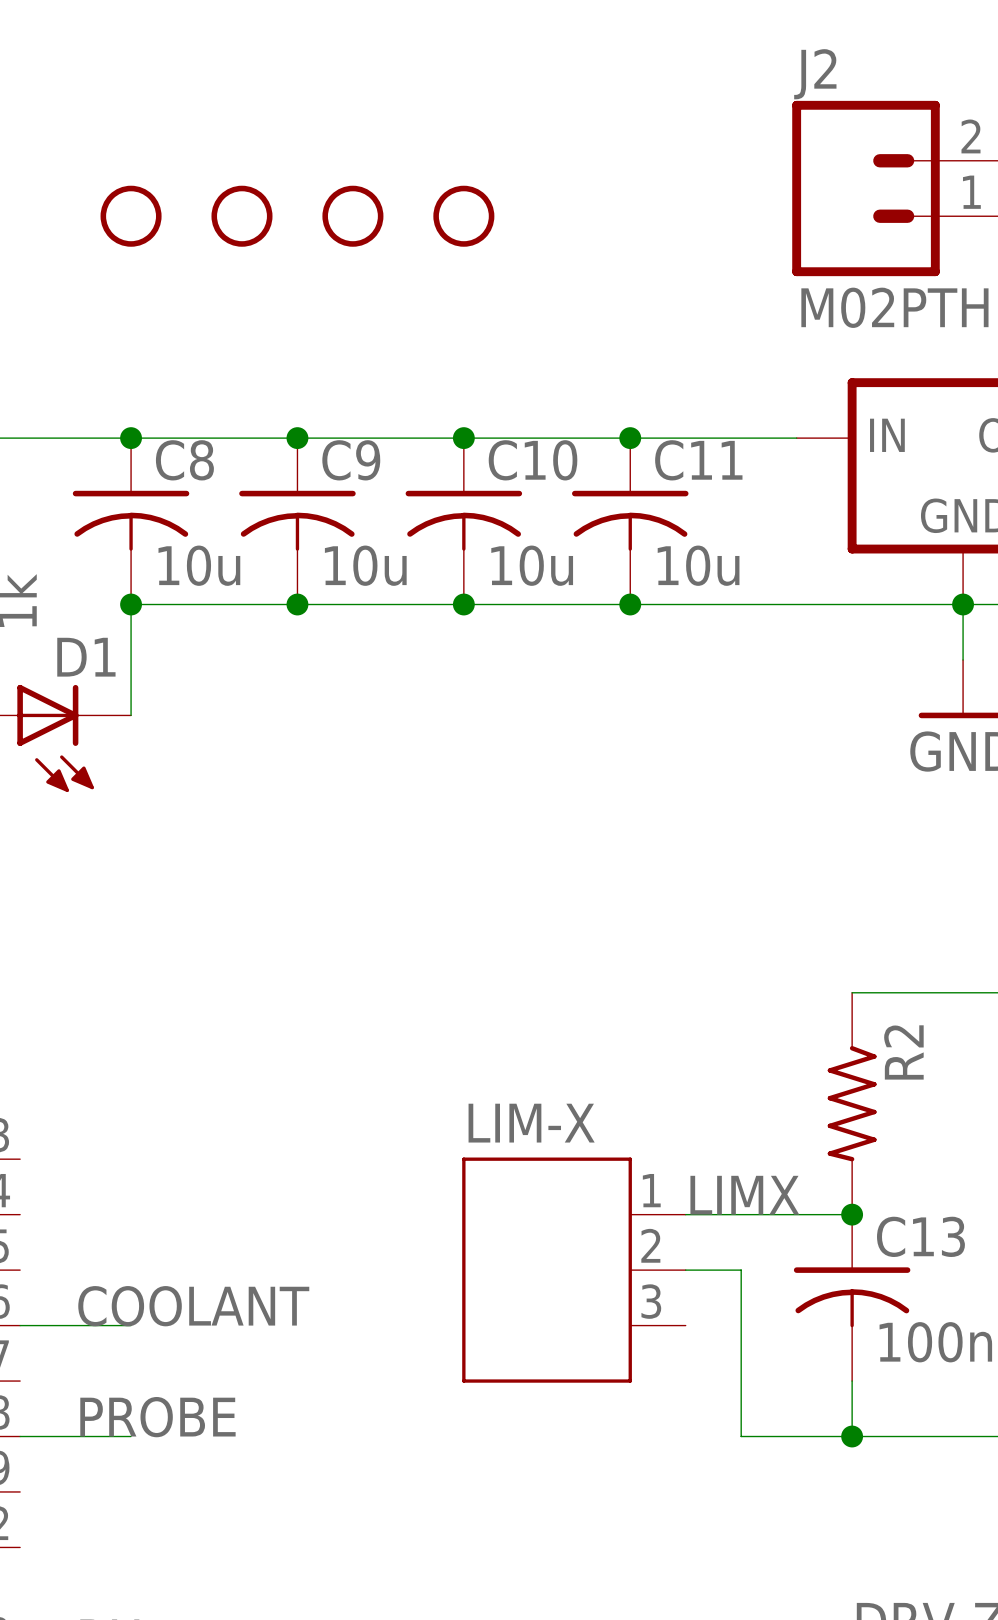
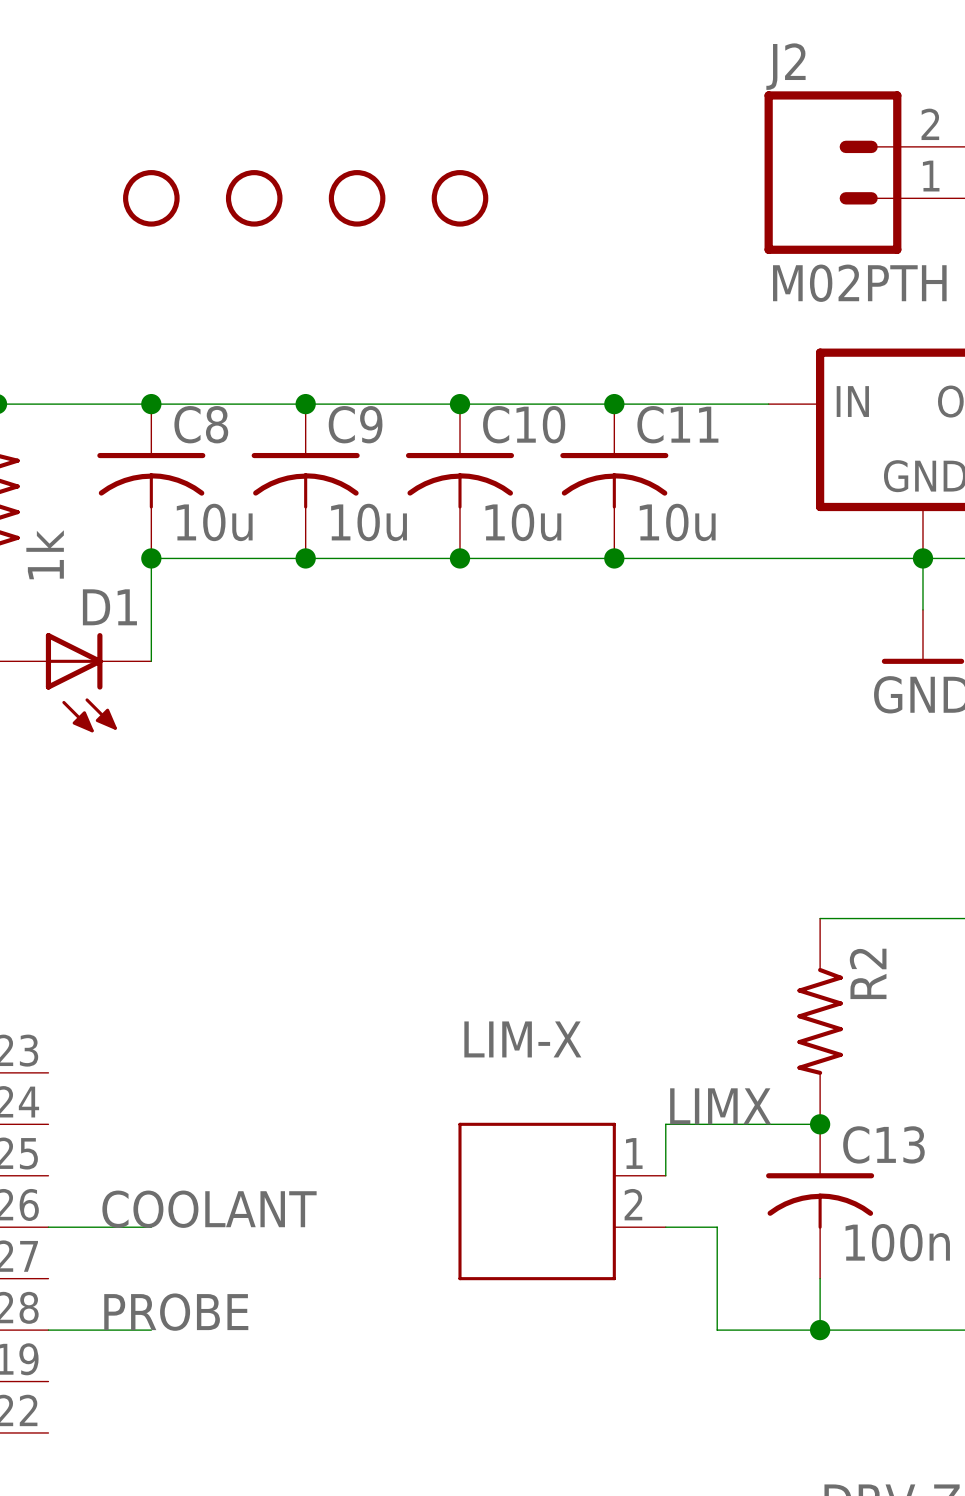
wire: none -> (665, 1124) (665, 1175)
LIM-X: (573, 1270) -> none
wire: (685, 1270) (741, 1270) (741, 1325) -> (665, 1227) (717, 1227)
LIM-X: none -> (562, 1201)

